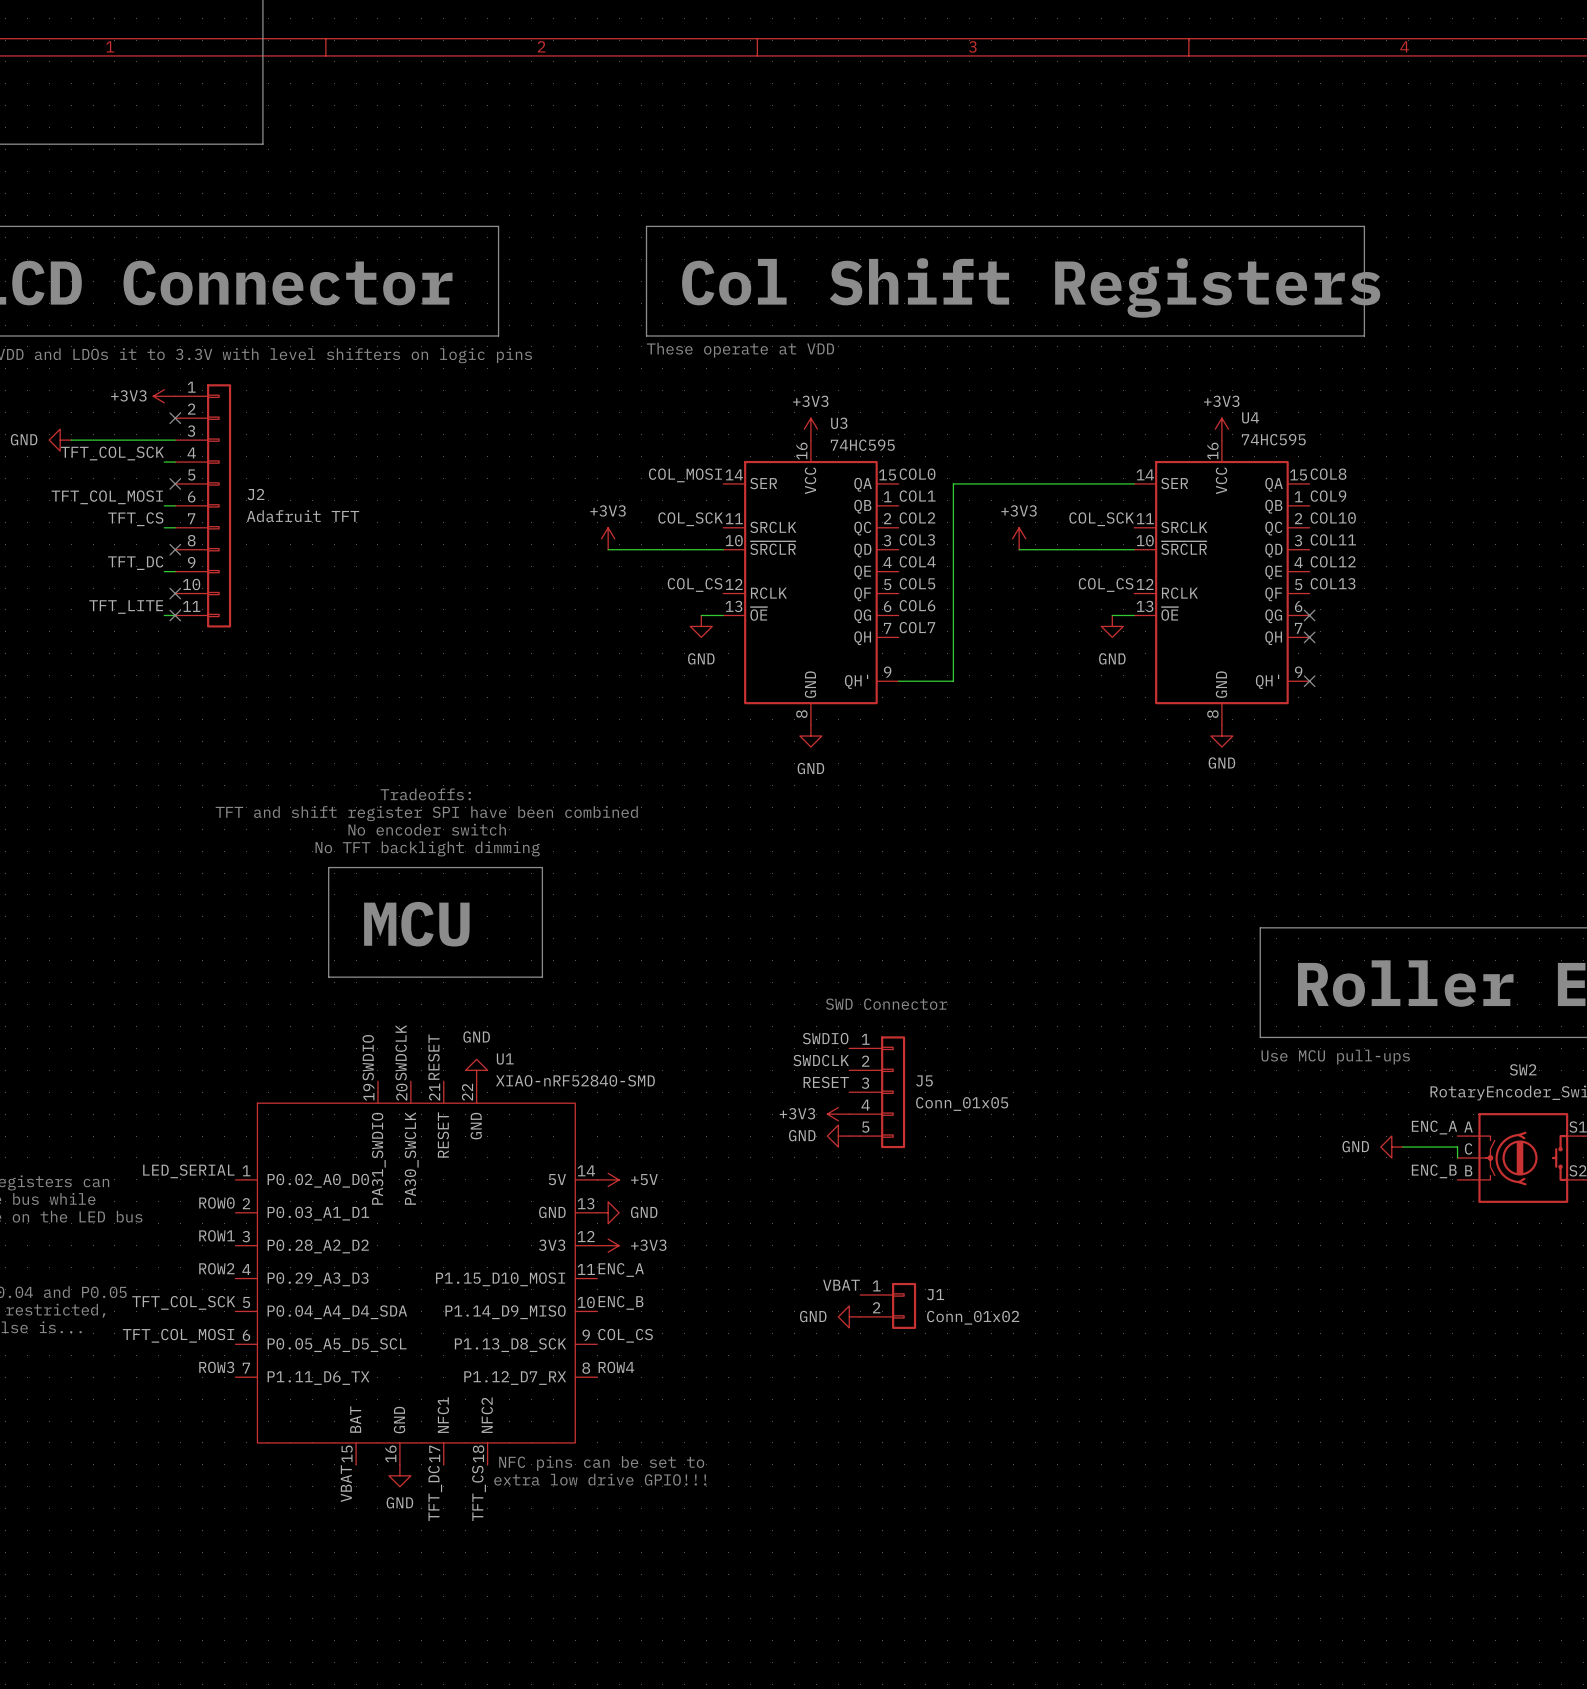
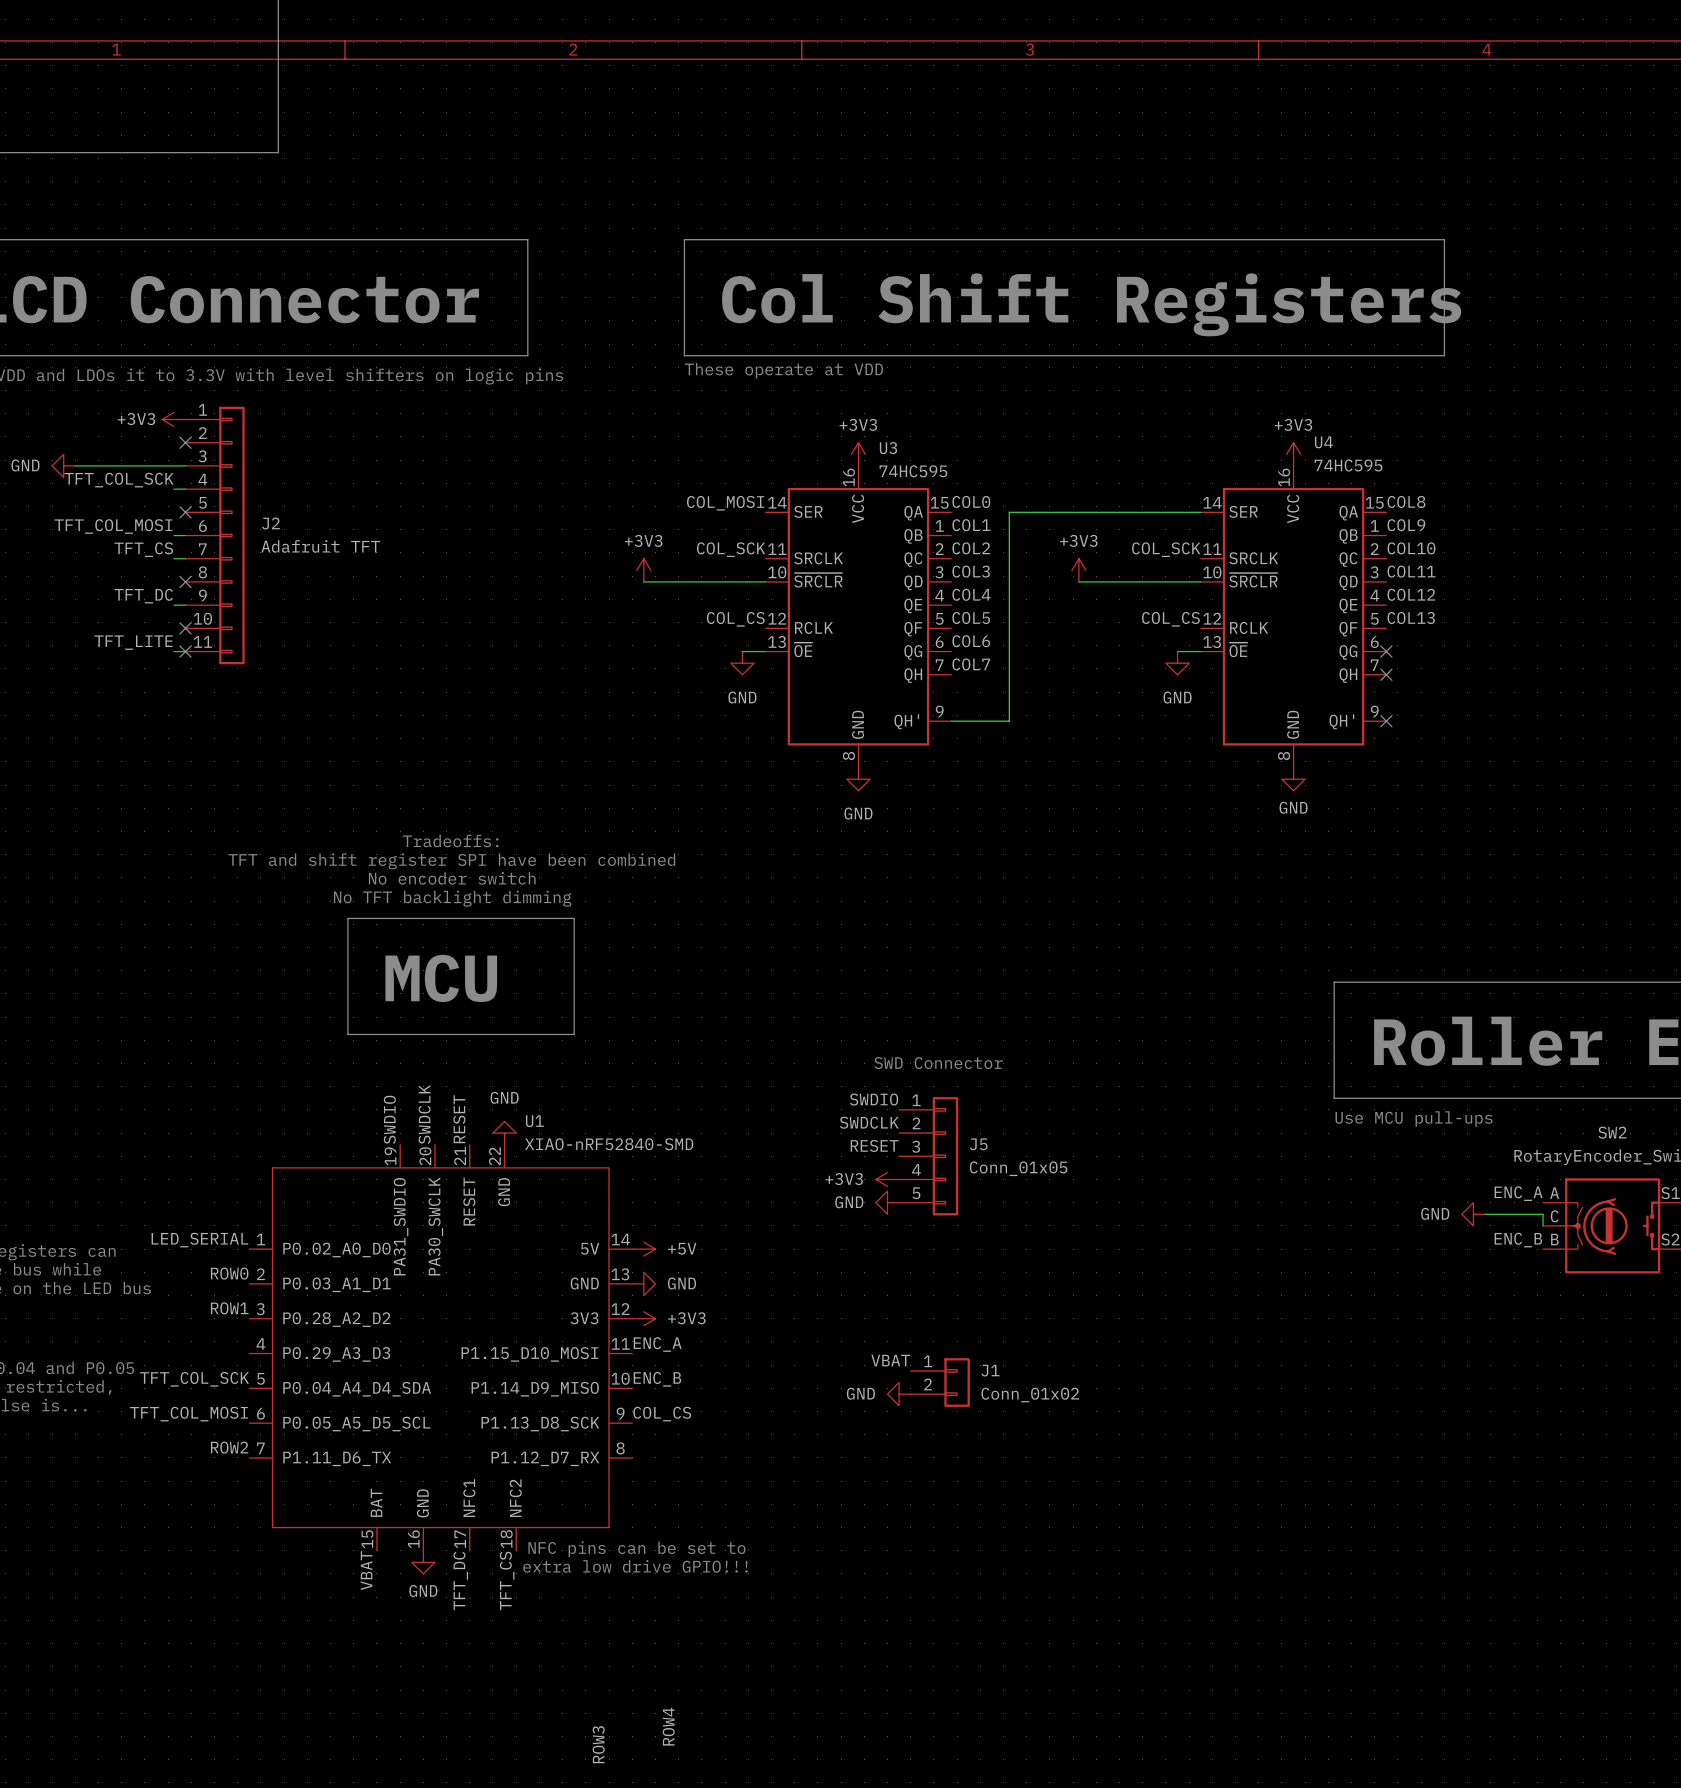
label: ROW2 (216, 1268) -> none
label: ROW3 (216, 1367) -> ROW2 (229, 1447)
label: ROW4 (616, 1367) -> none
label: none -> ROW4 (668, 1726)
label: none -> ROW3 (598, 1744)

